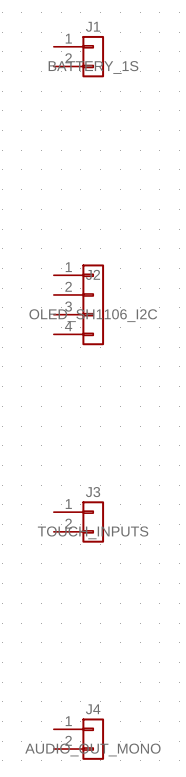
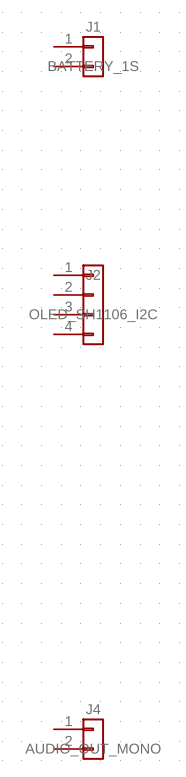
J3: TOUCH_INPUTS (78, 521) -> none

